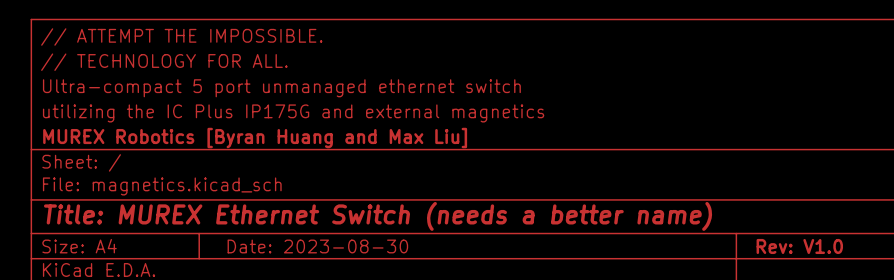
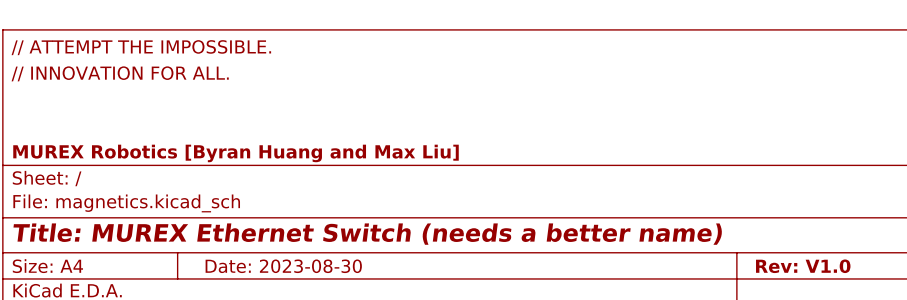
title block: // TECHNOLOGY FOR ALL. (164, 62) -> // INNOVATION FOR ALL. (120, 73)
title block: Ultra-compact 5 port unmanaged ethernet switch (281, 88) -> none
title block: utilizing the IC Plus IP175G and external magnetics (293, 113) -> none

